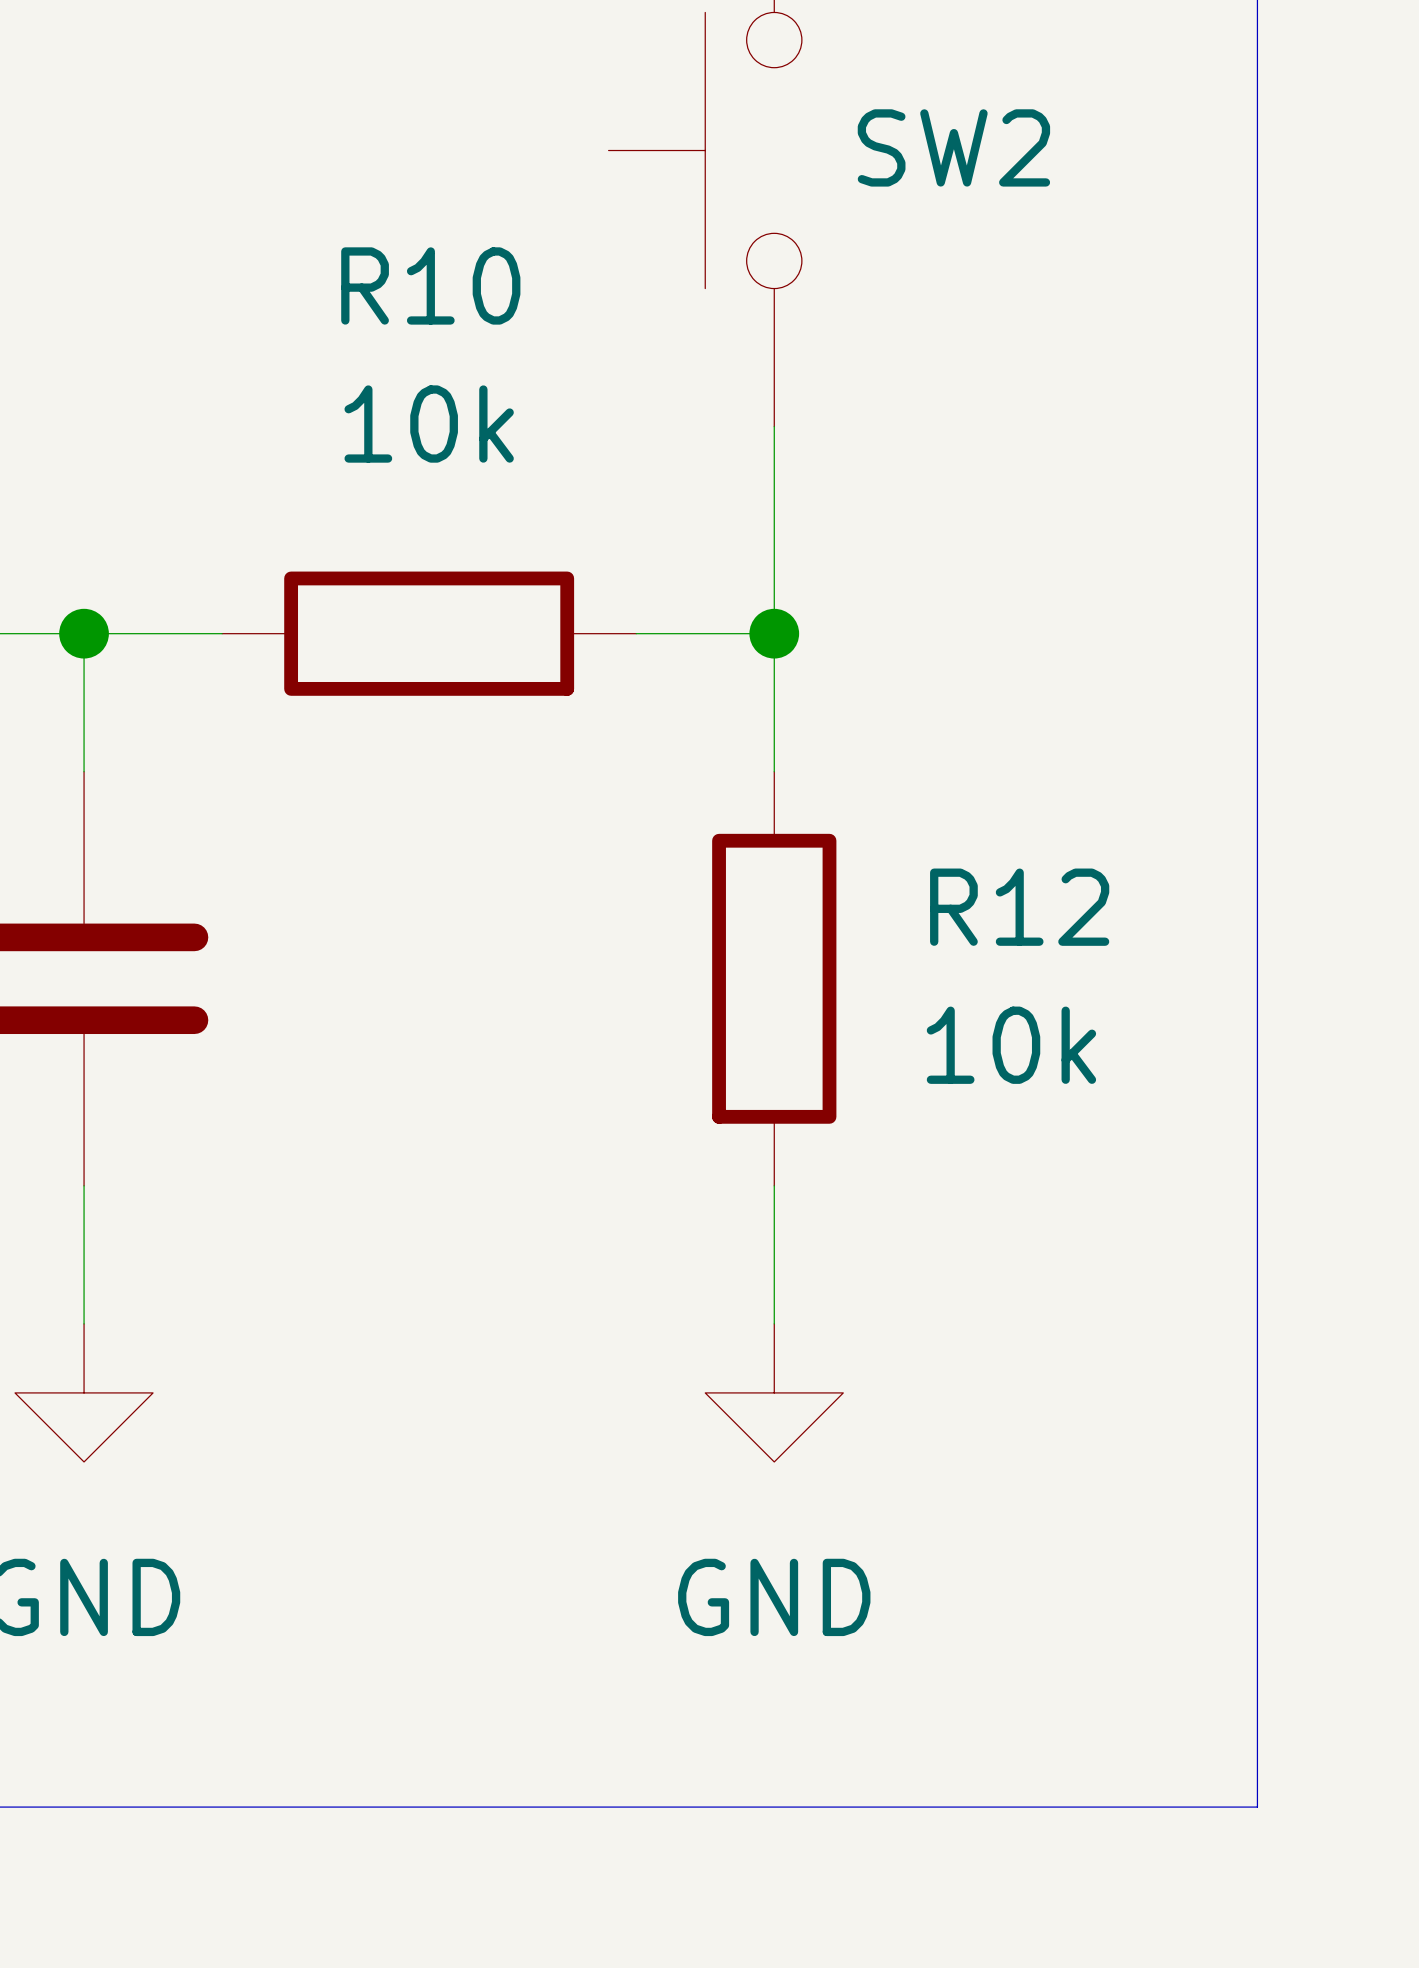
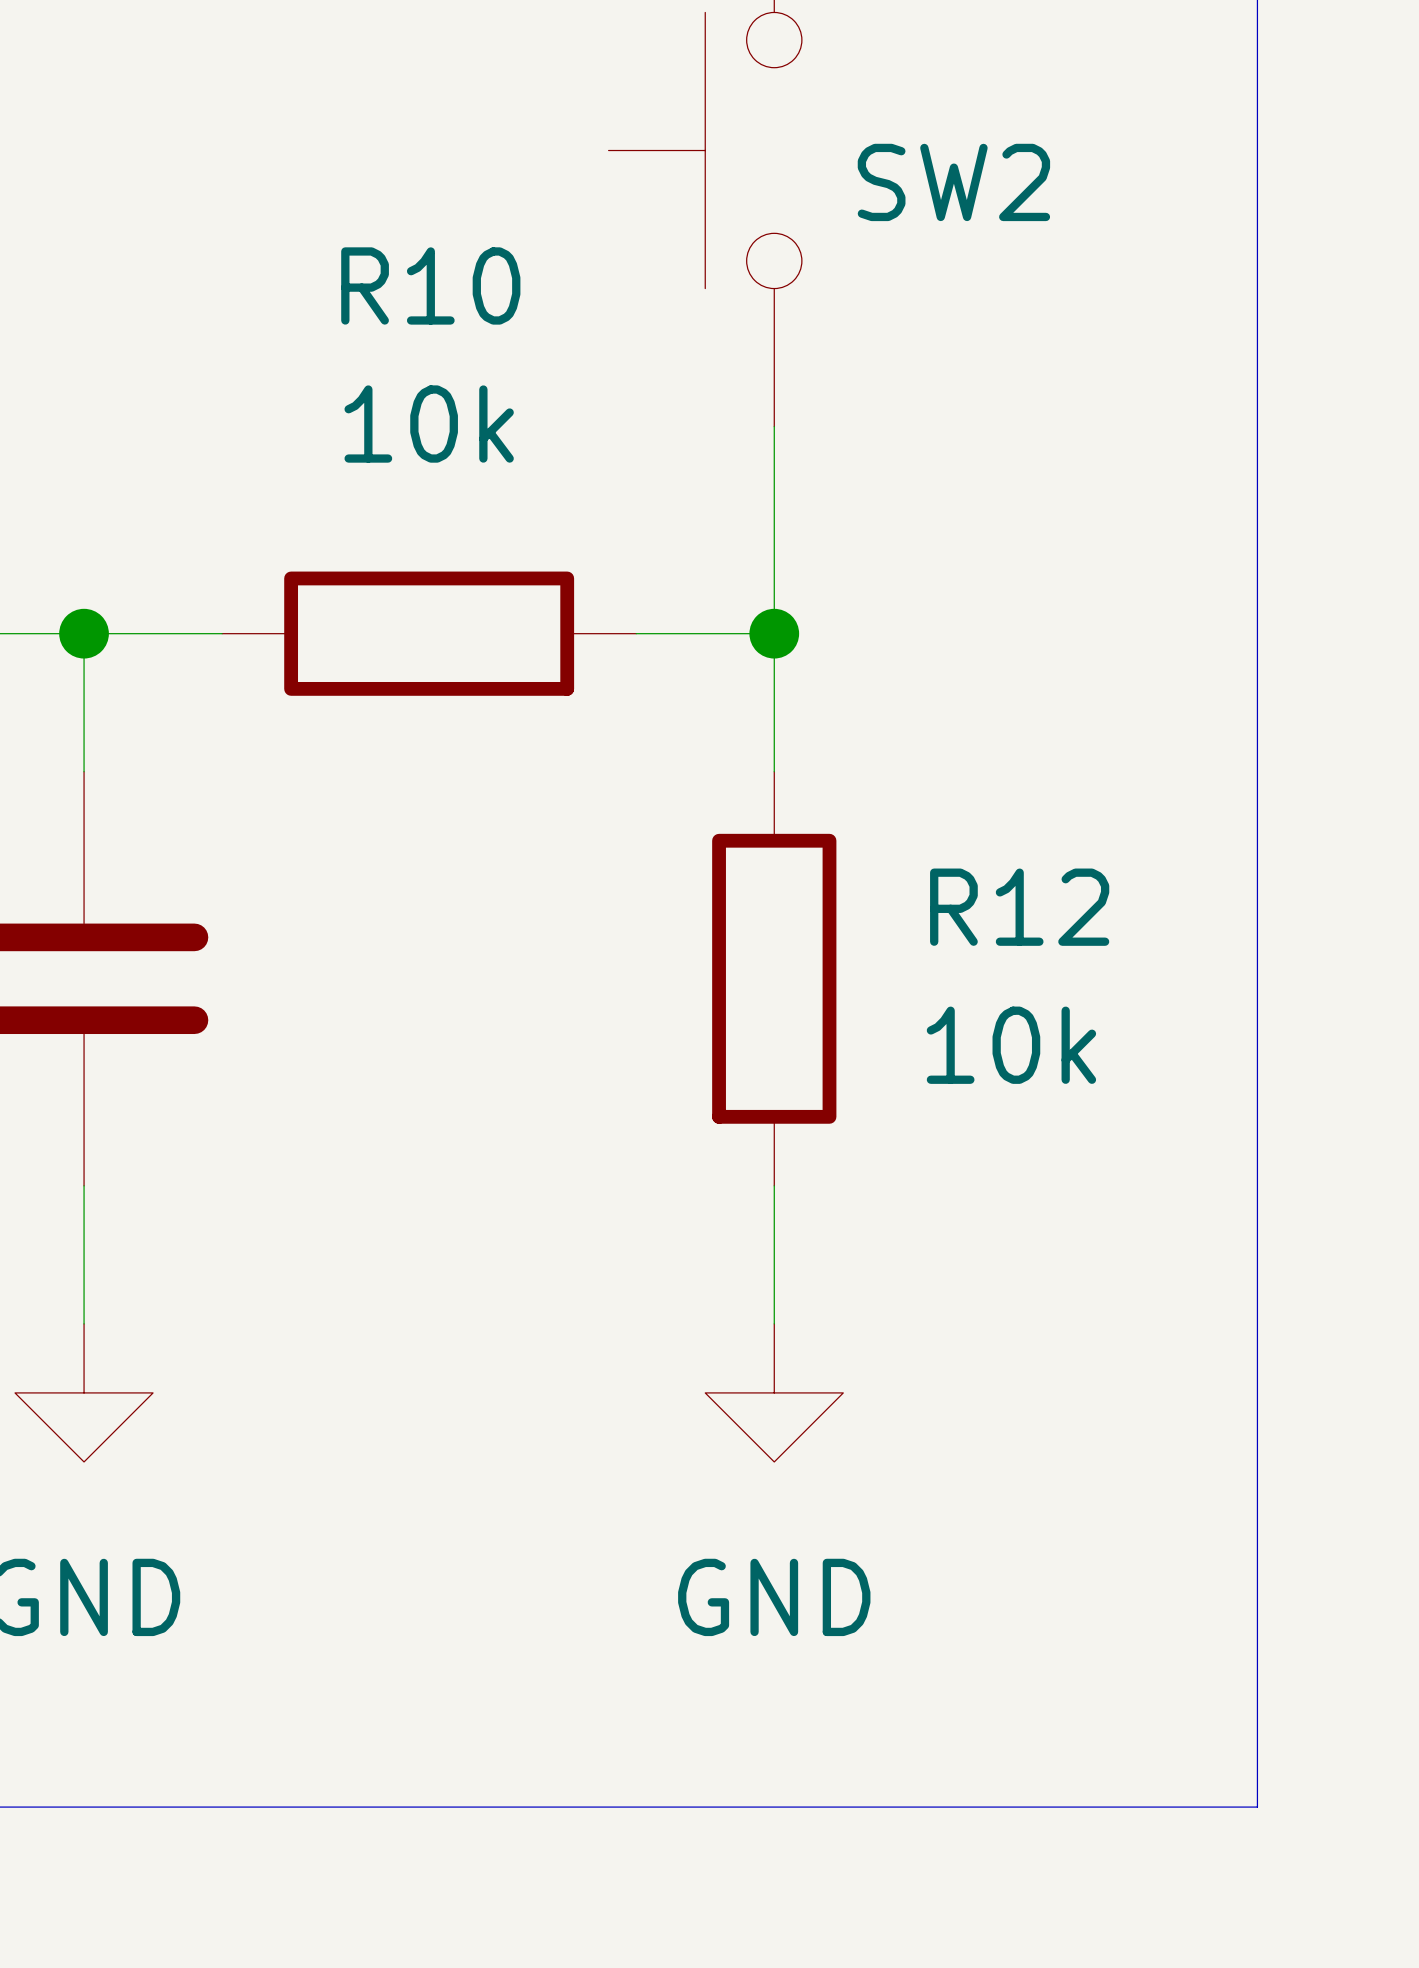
SW2 name position: SW2 (953, 147) -> SW2 (953, 182)

